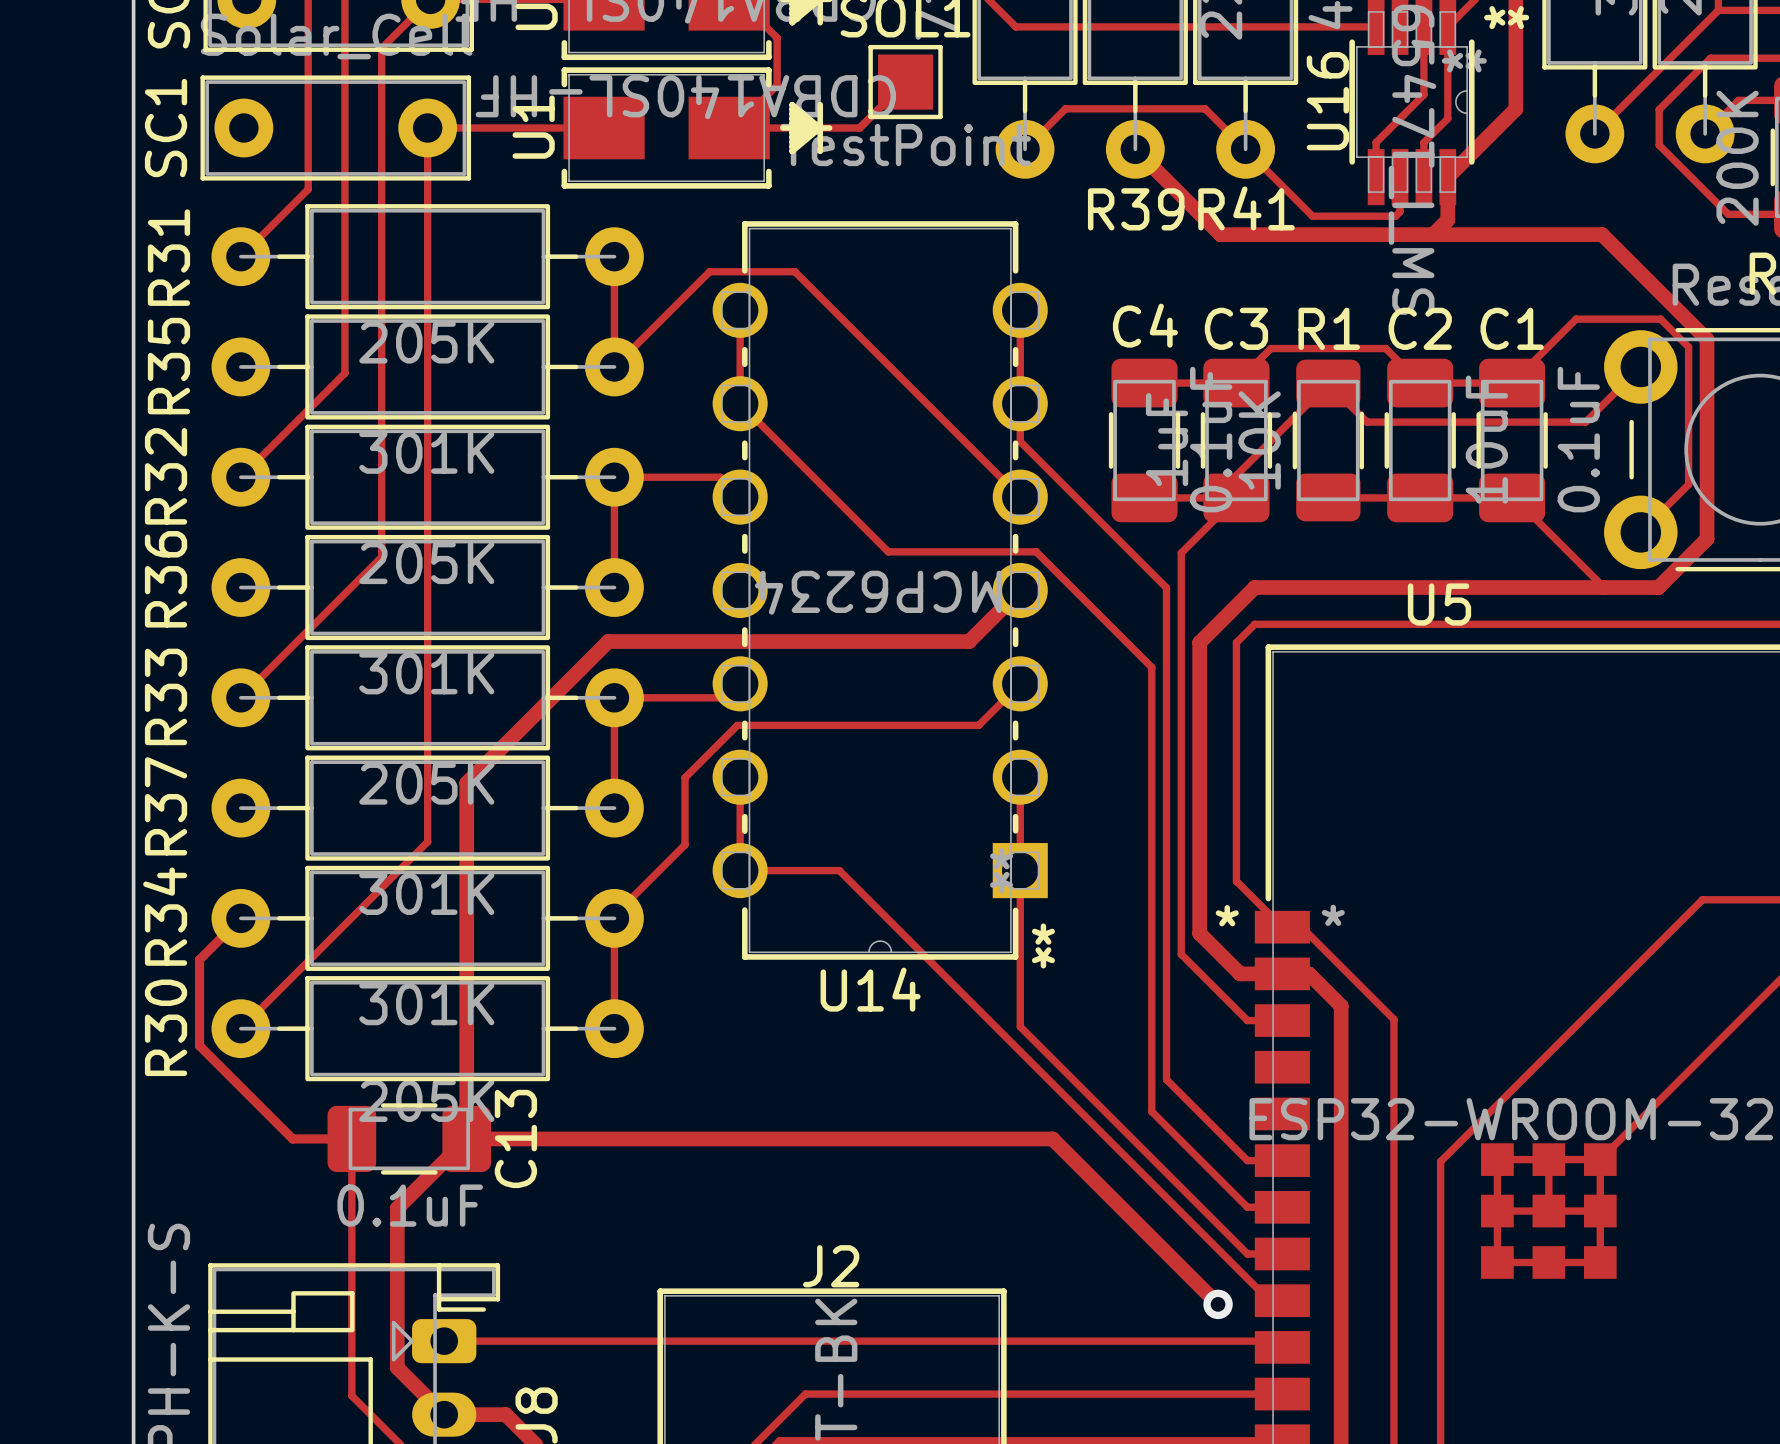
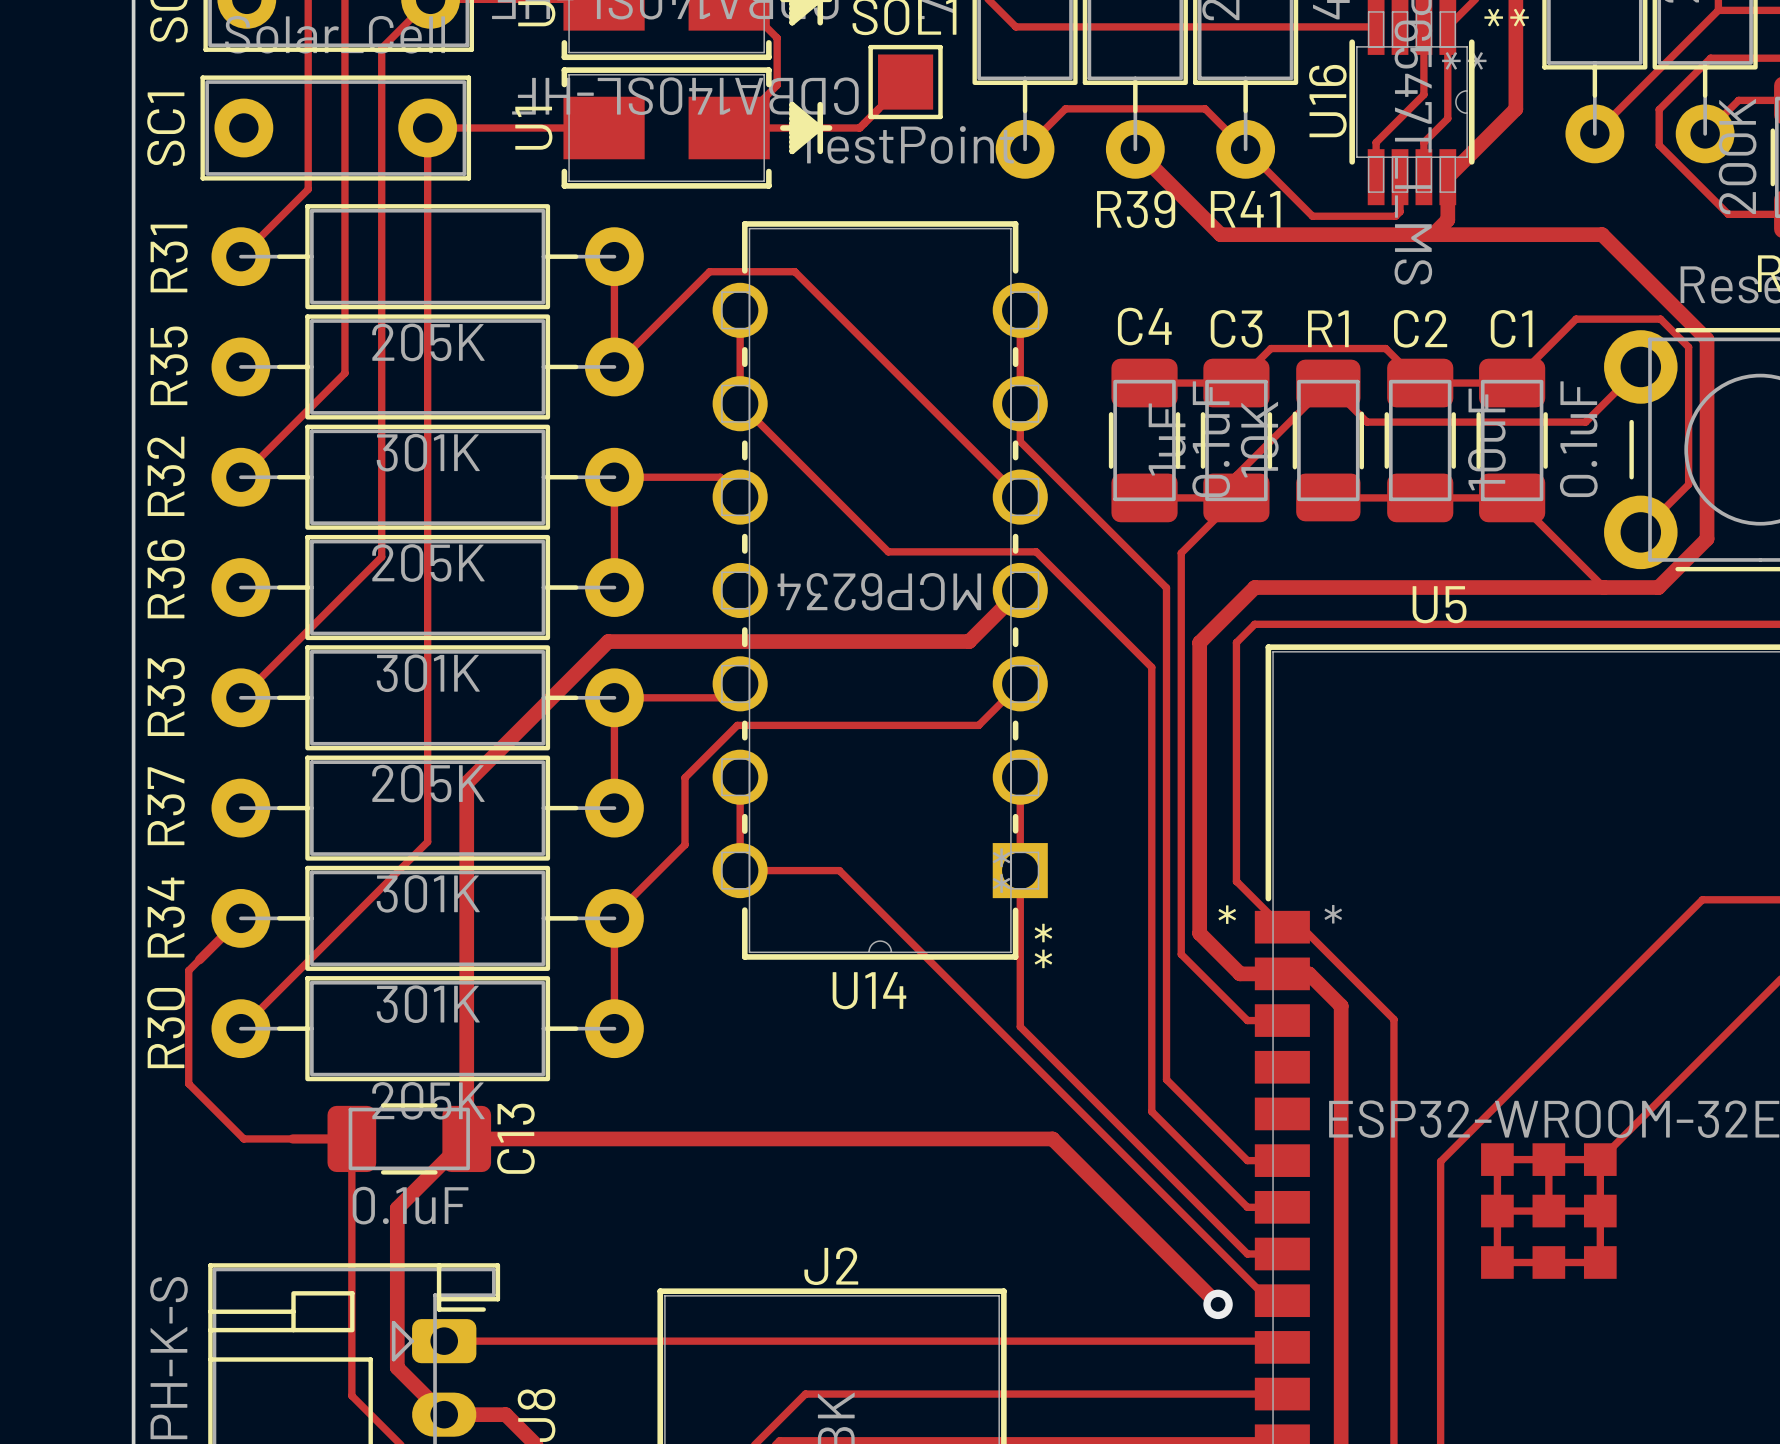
track: (199, 959) (199, 1045) (292, 1138) -> (199, 959) (188, 970) (188, 1083) (243, 1138) (292, 1138)

